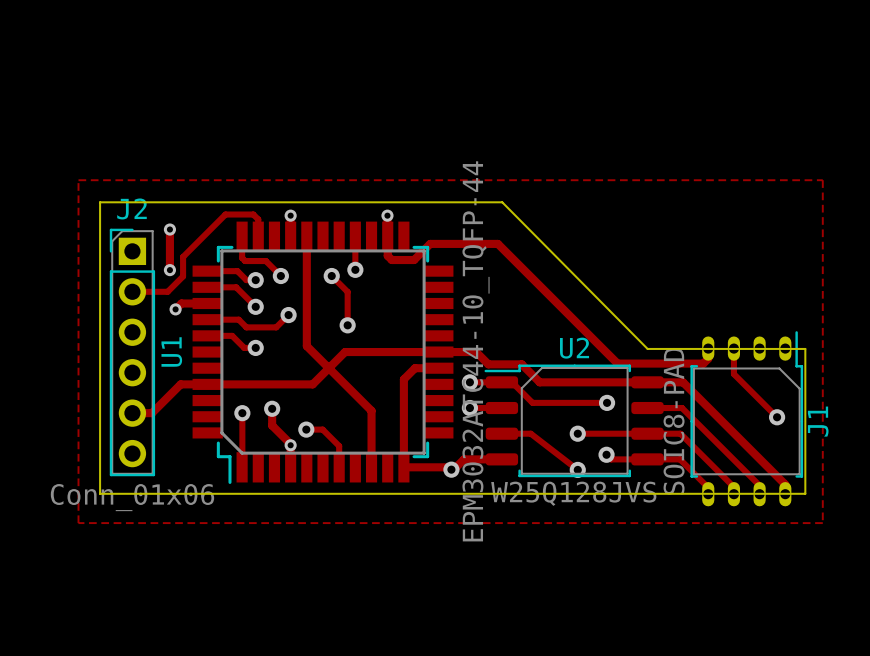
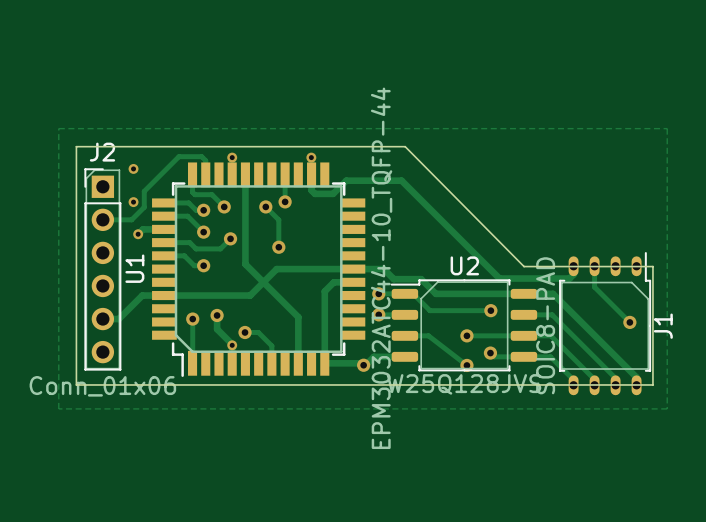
track: (169, 229) (169, 270) -> none

